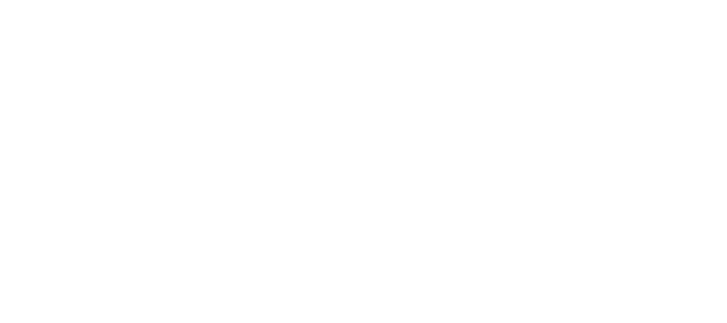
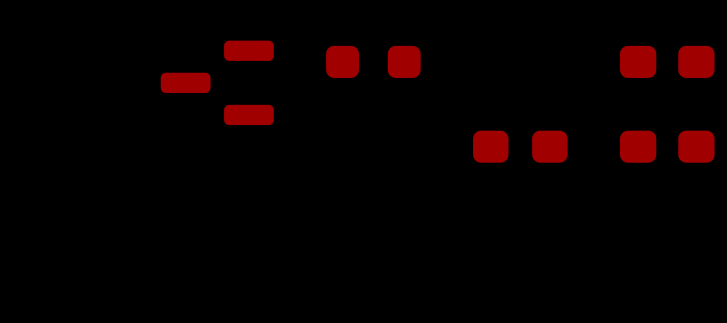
part: none -> (373, 61)
part: none -> (667, 61)
part: none -> (217, 82)
part: none -> (520, 146)
part: none -> (667, 146)

